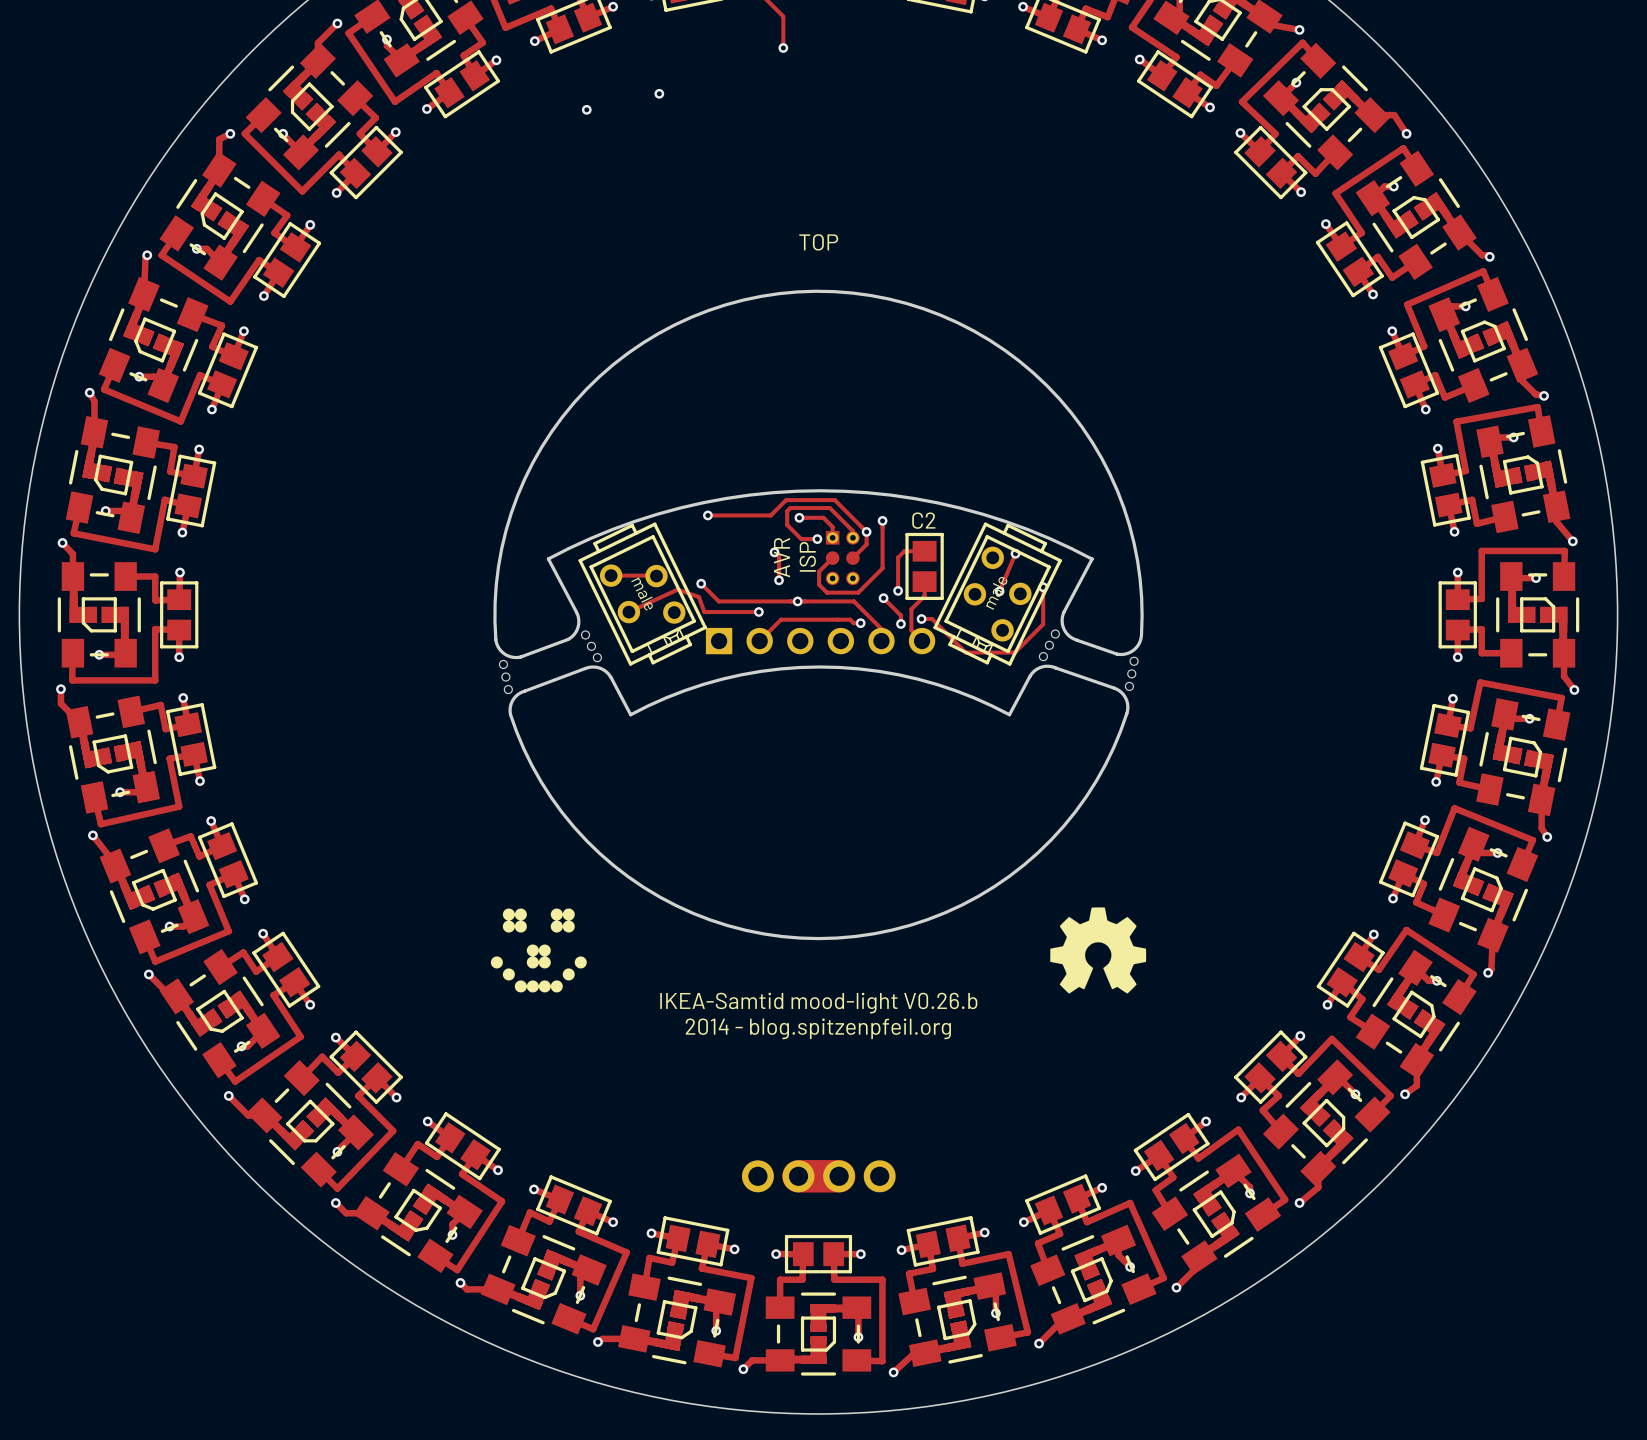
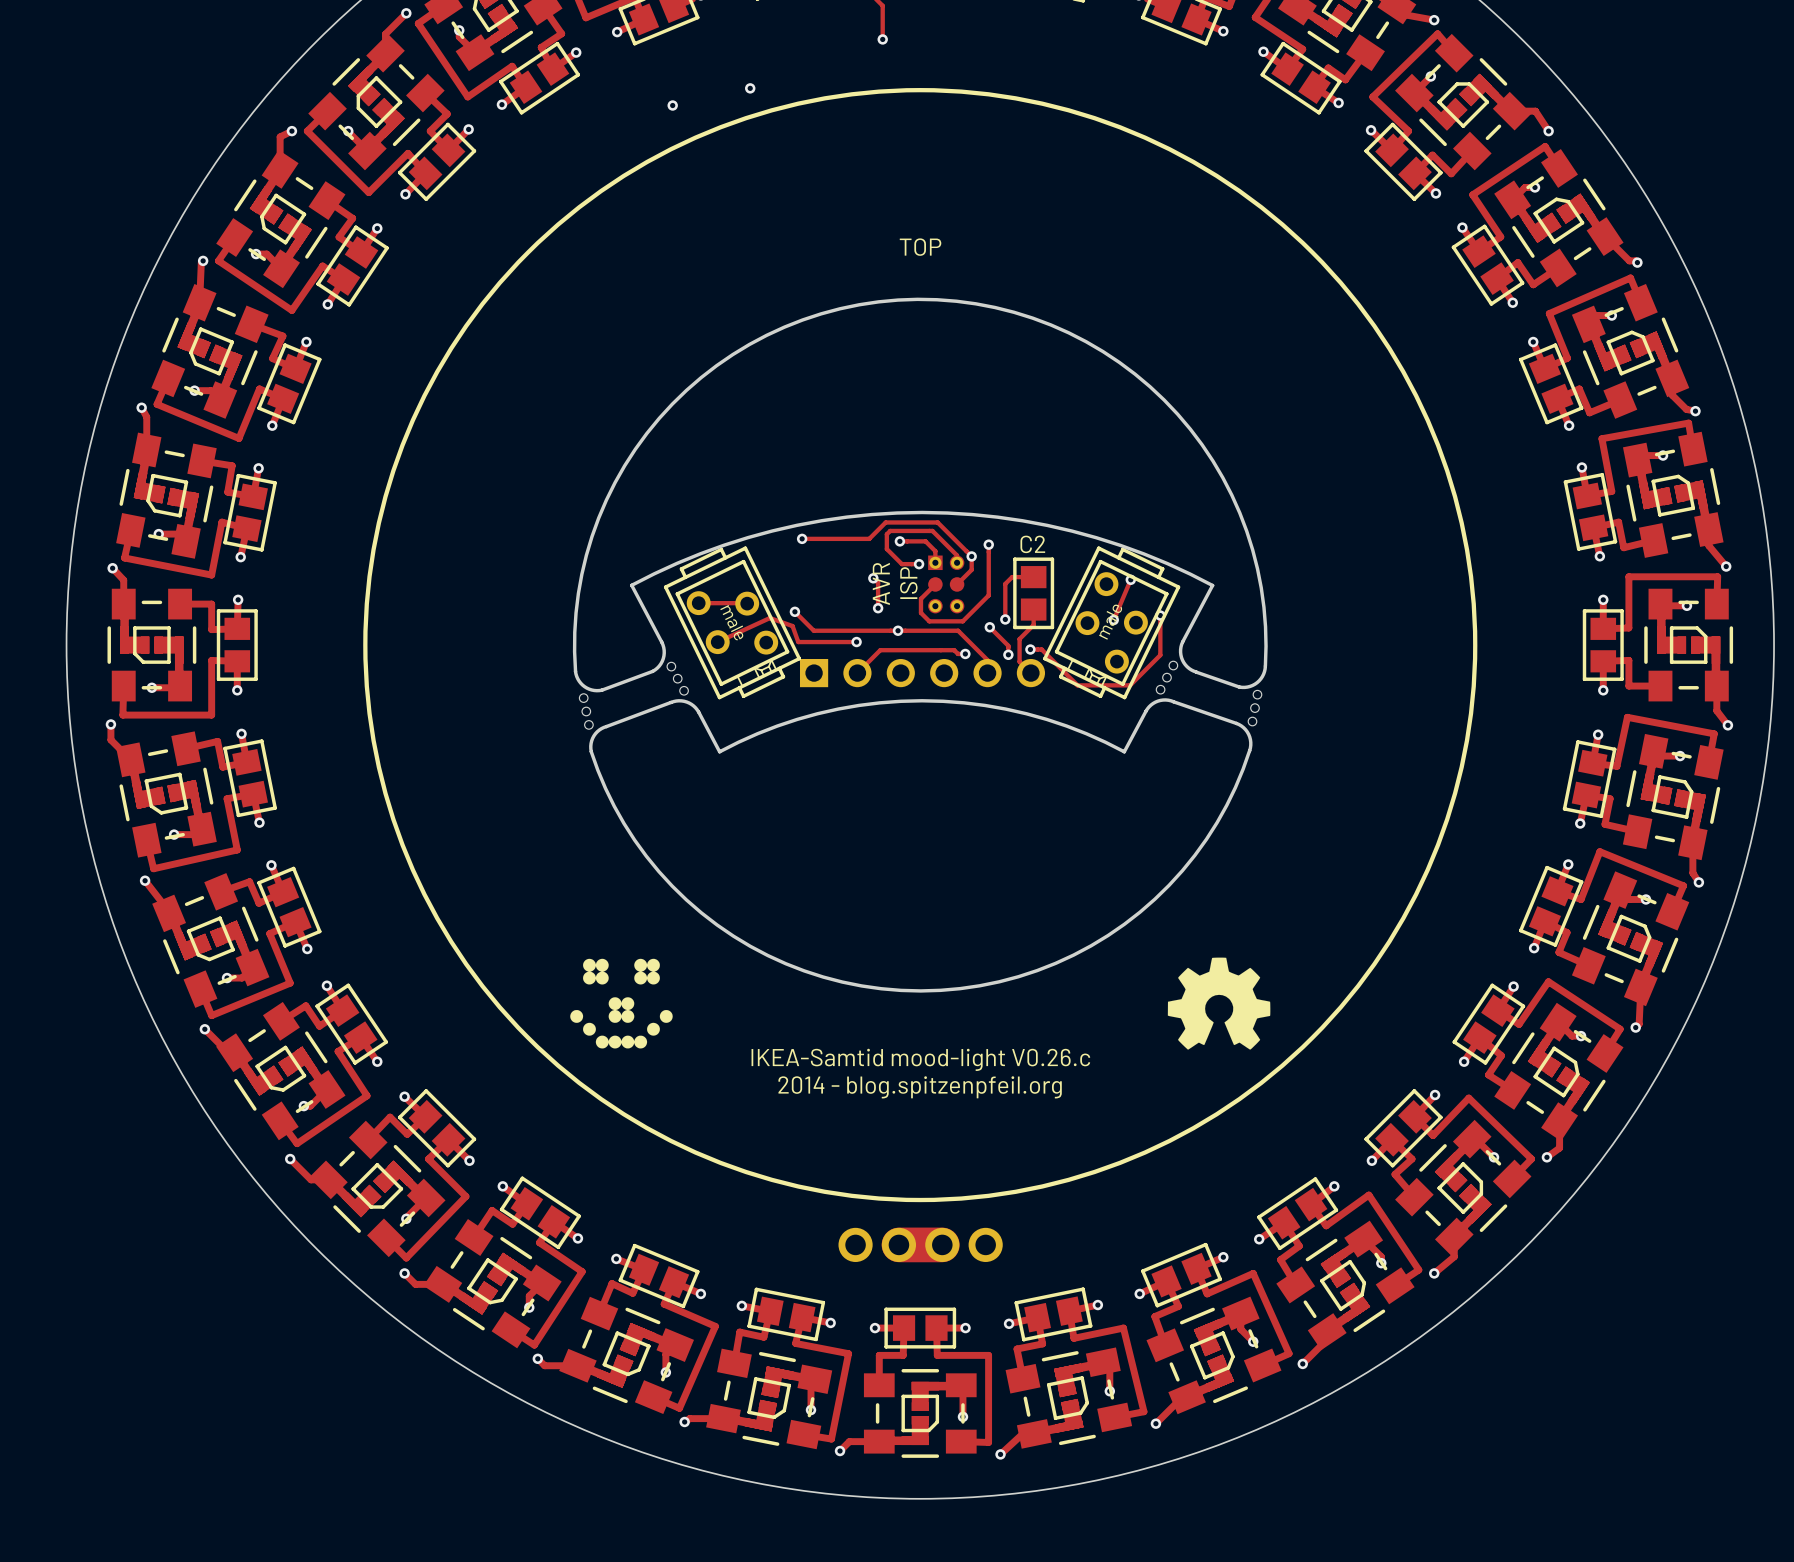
drawing: none -> [363, 88, 1478, 1203]
text: IKEA-Samtid mood-light V0.26.b (818, 1003) -> IKEA-Samtid mood-light V0.26.c (920, 1059)

